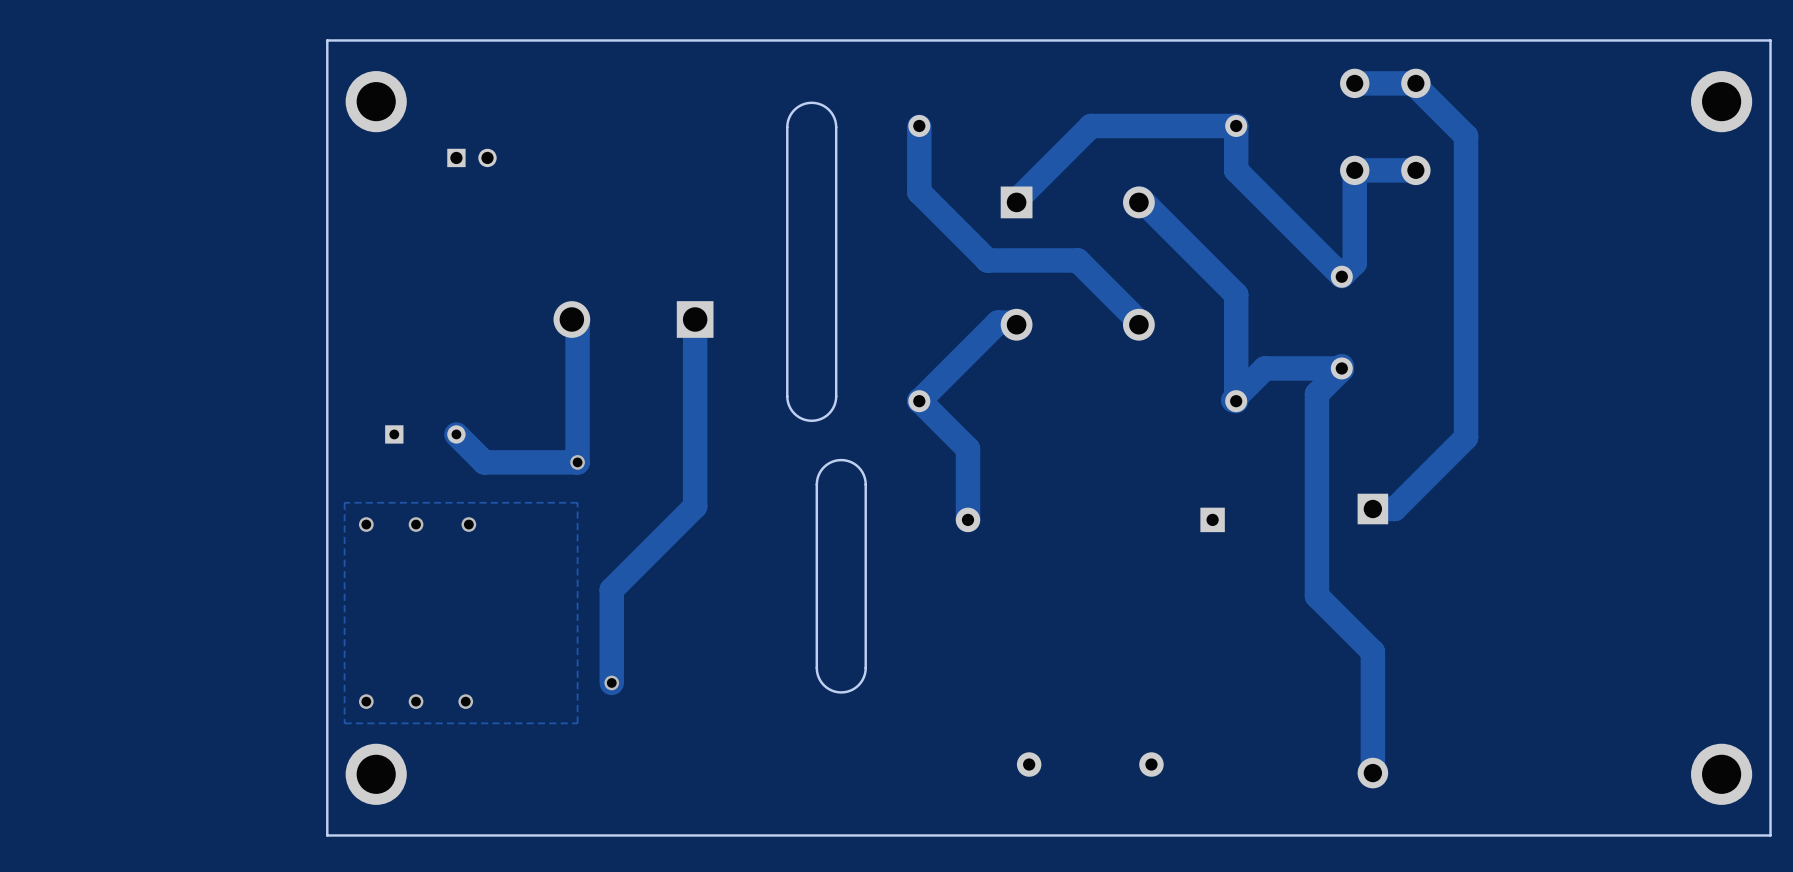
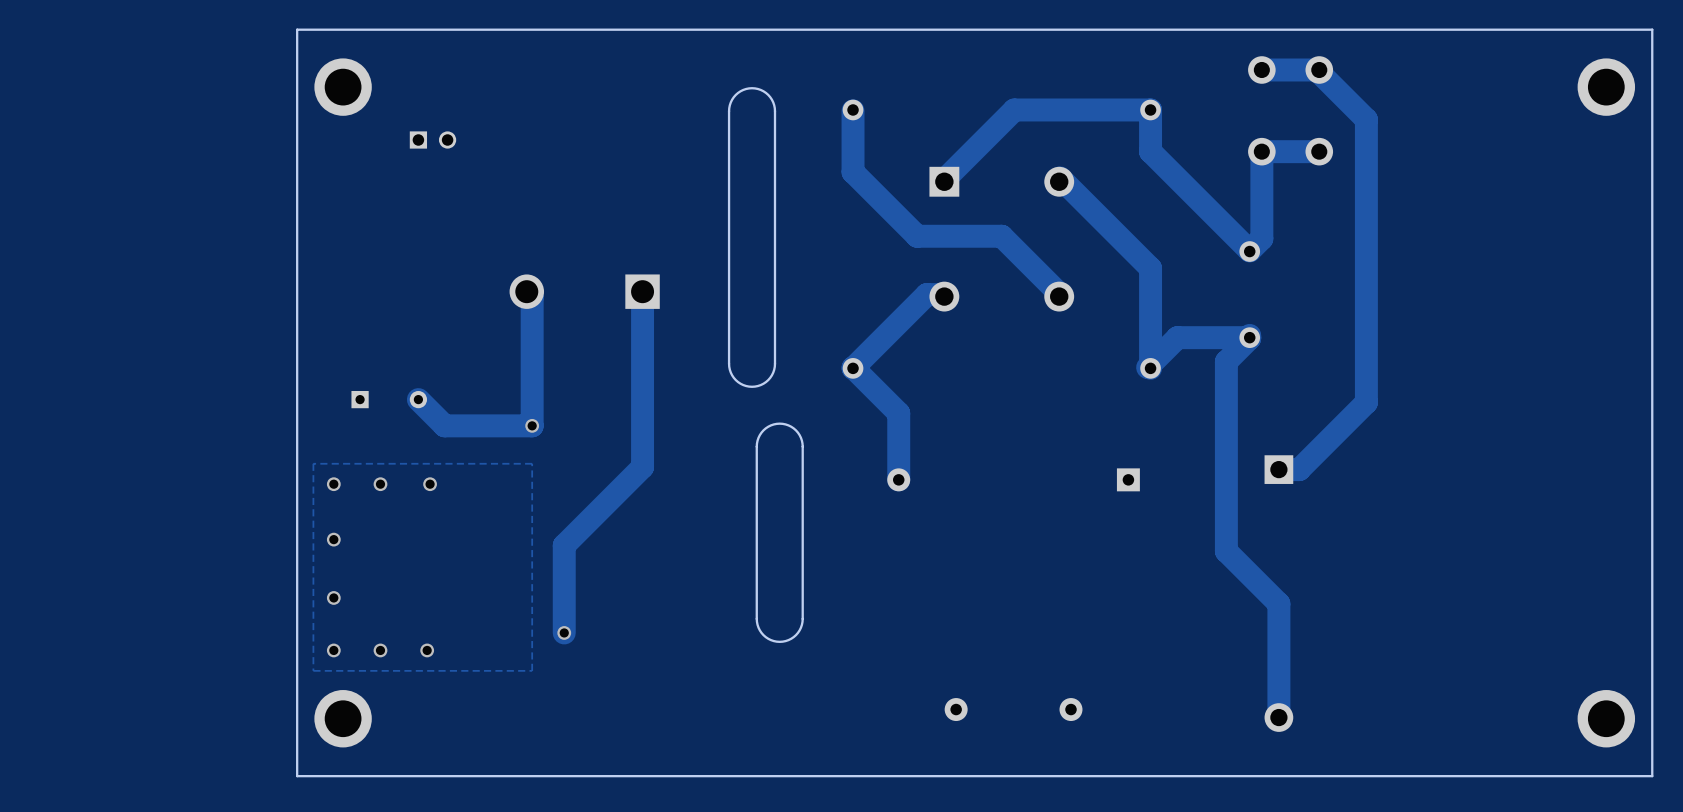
via: none -> (333, 539)
via: none -> (333, 597)

